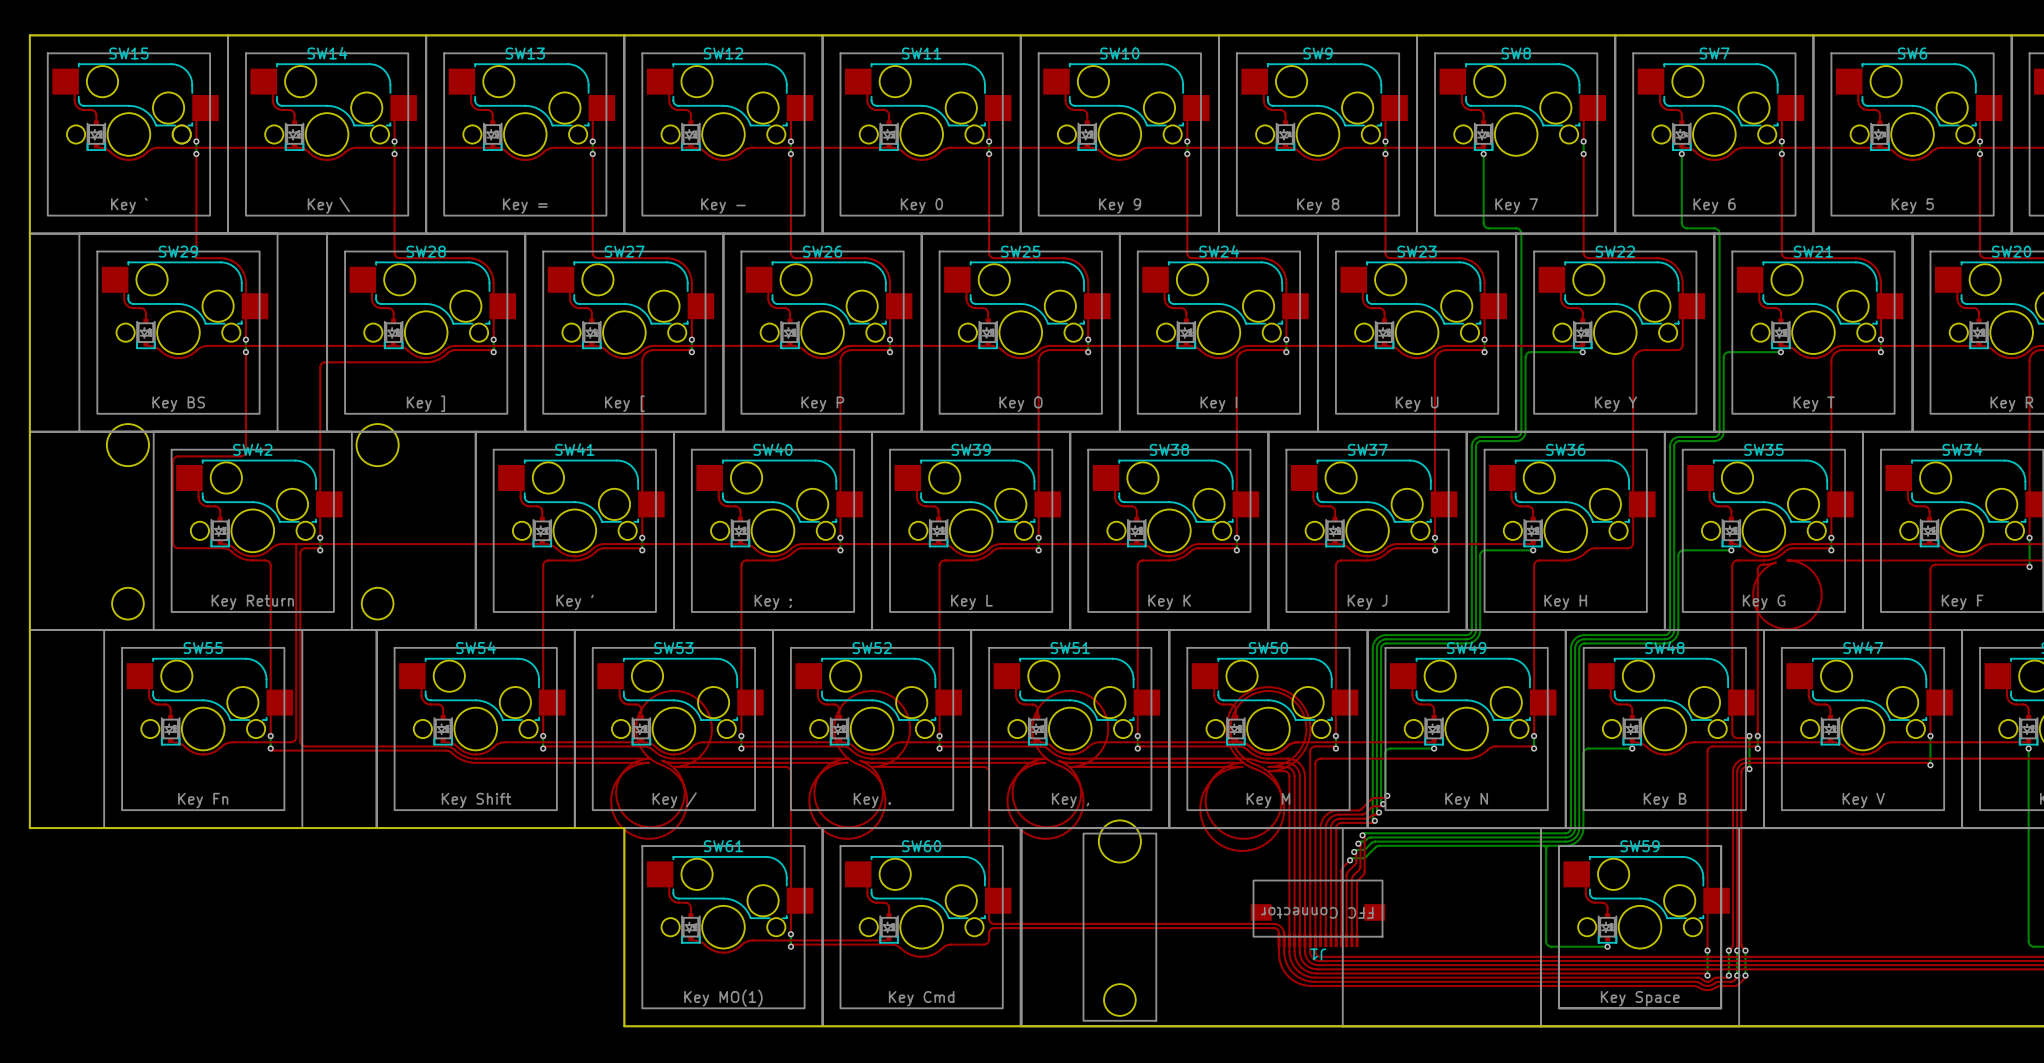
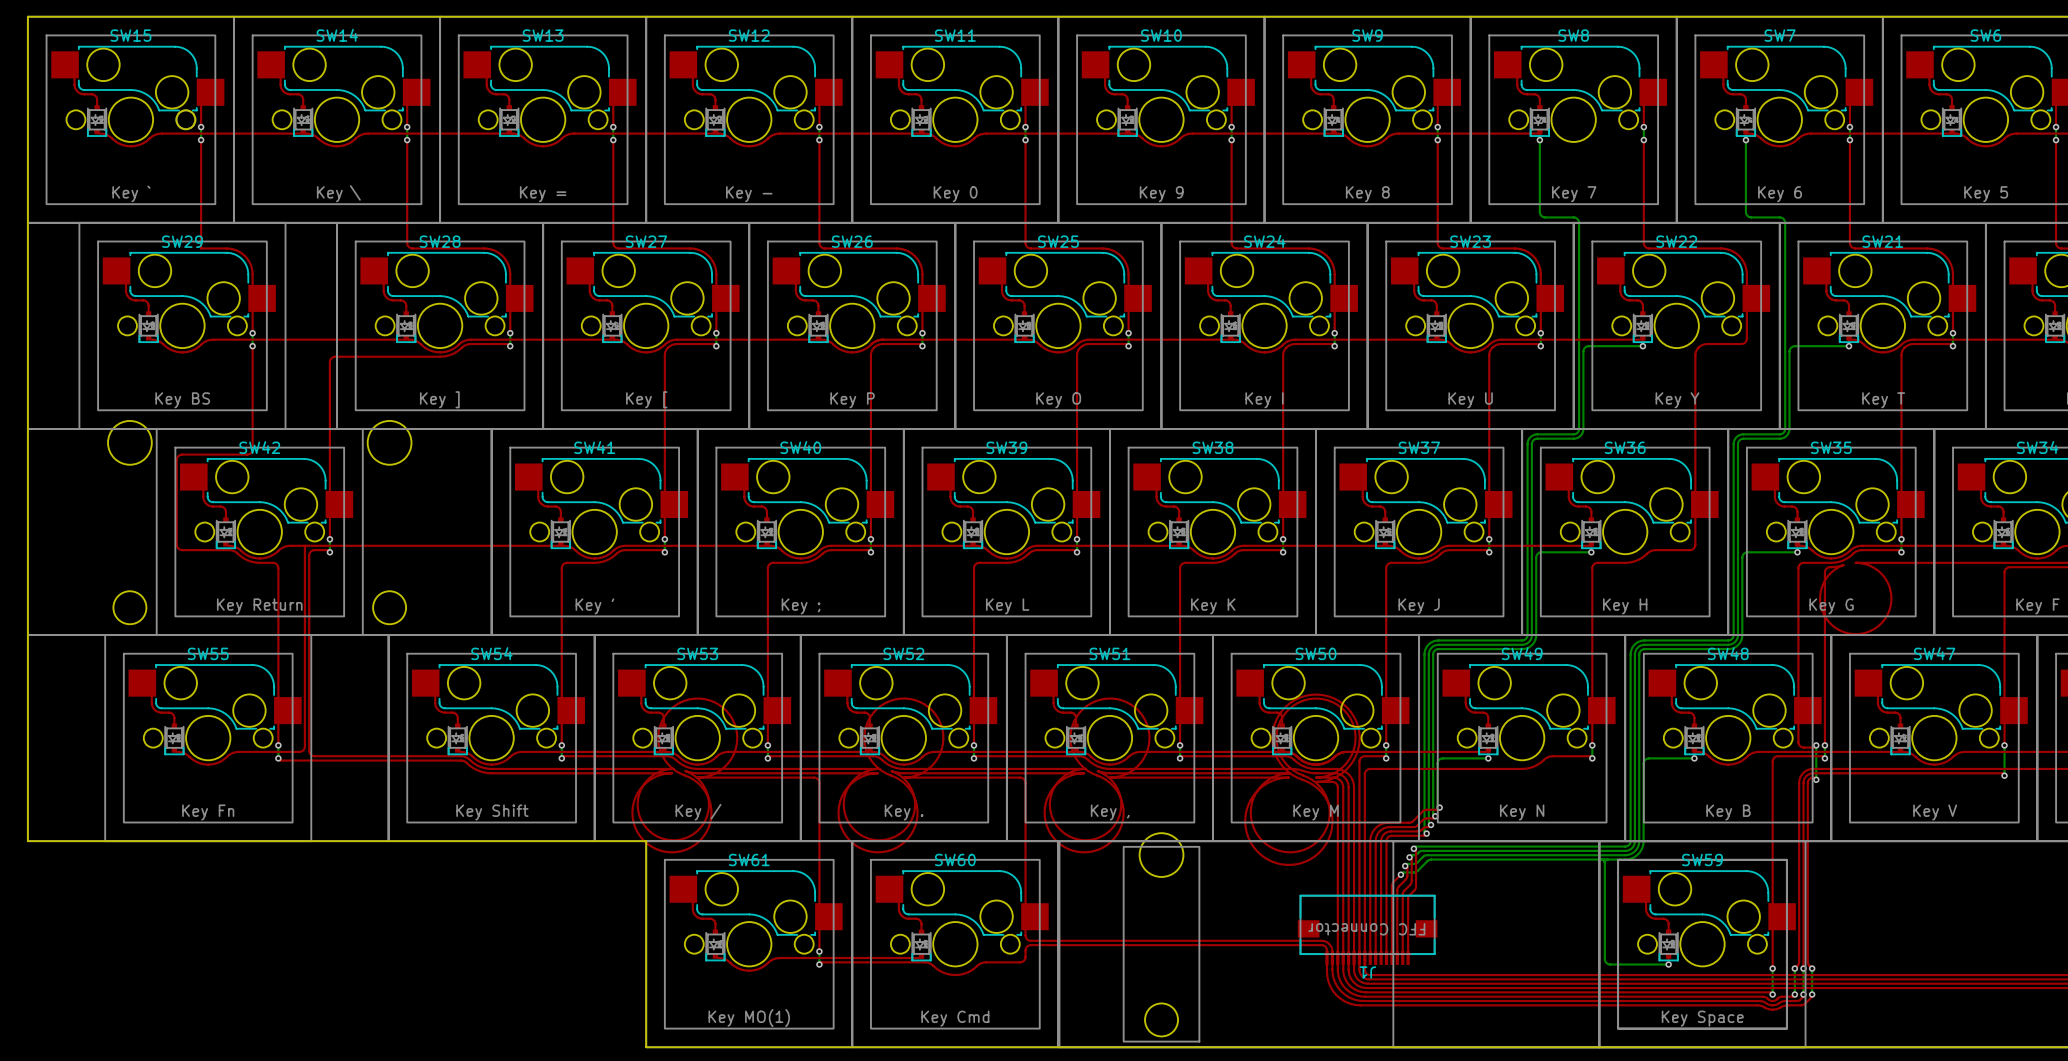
J1 footprint: [1250, 880, 1386, 948] -> [1297, 895, 1438, 965]

